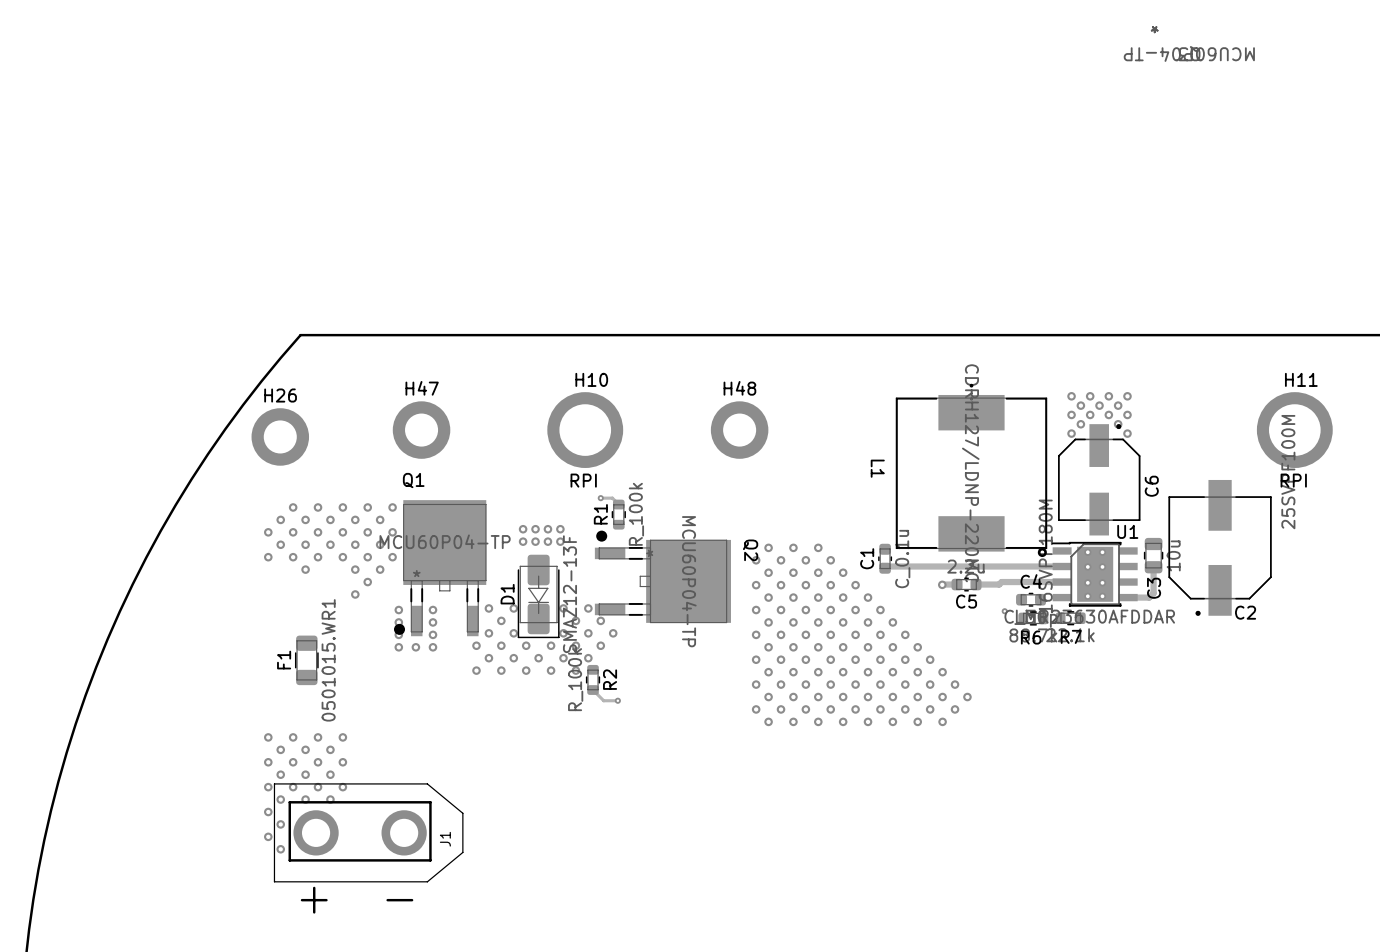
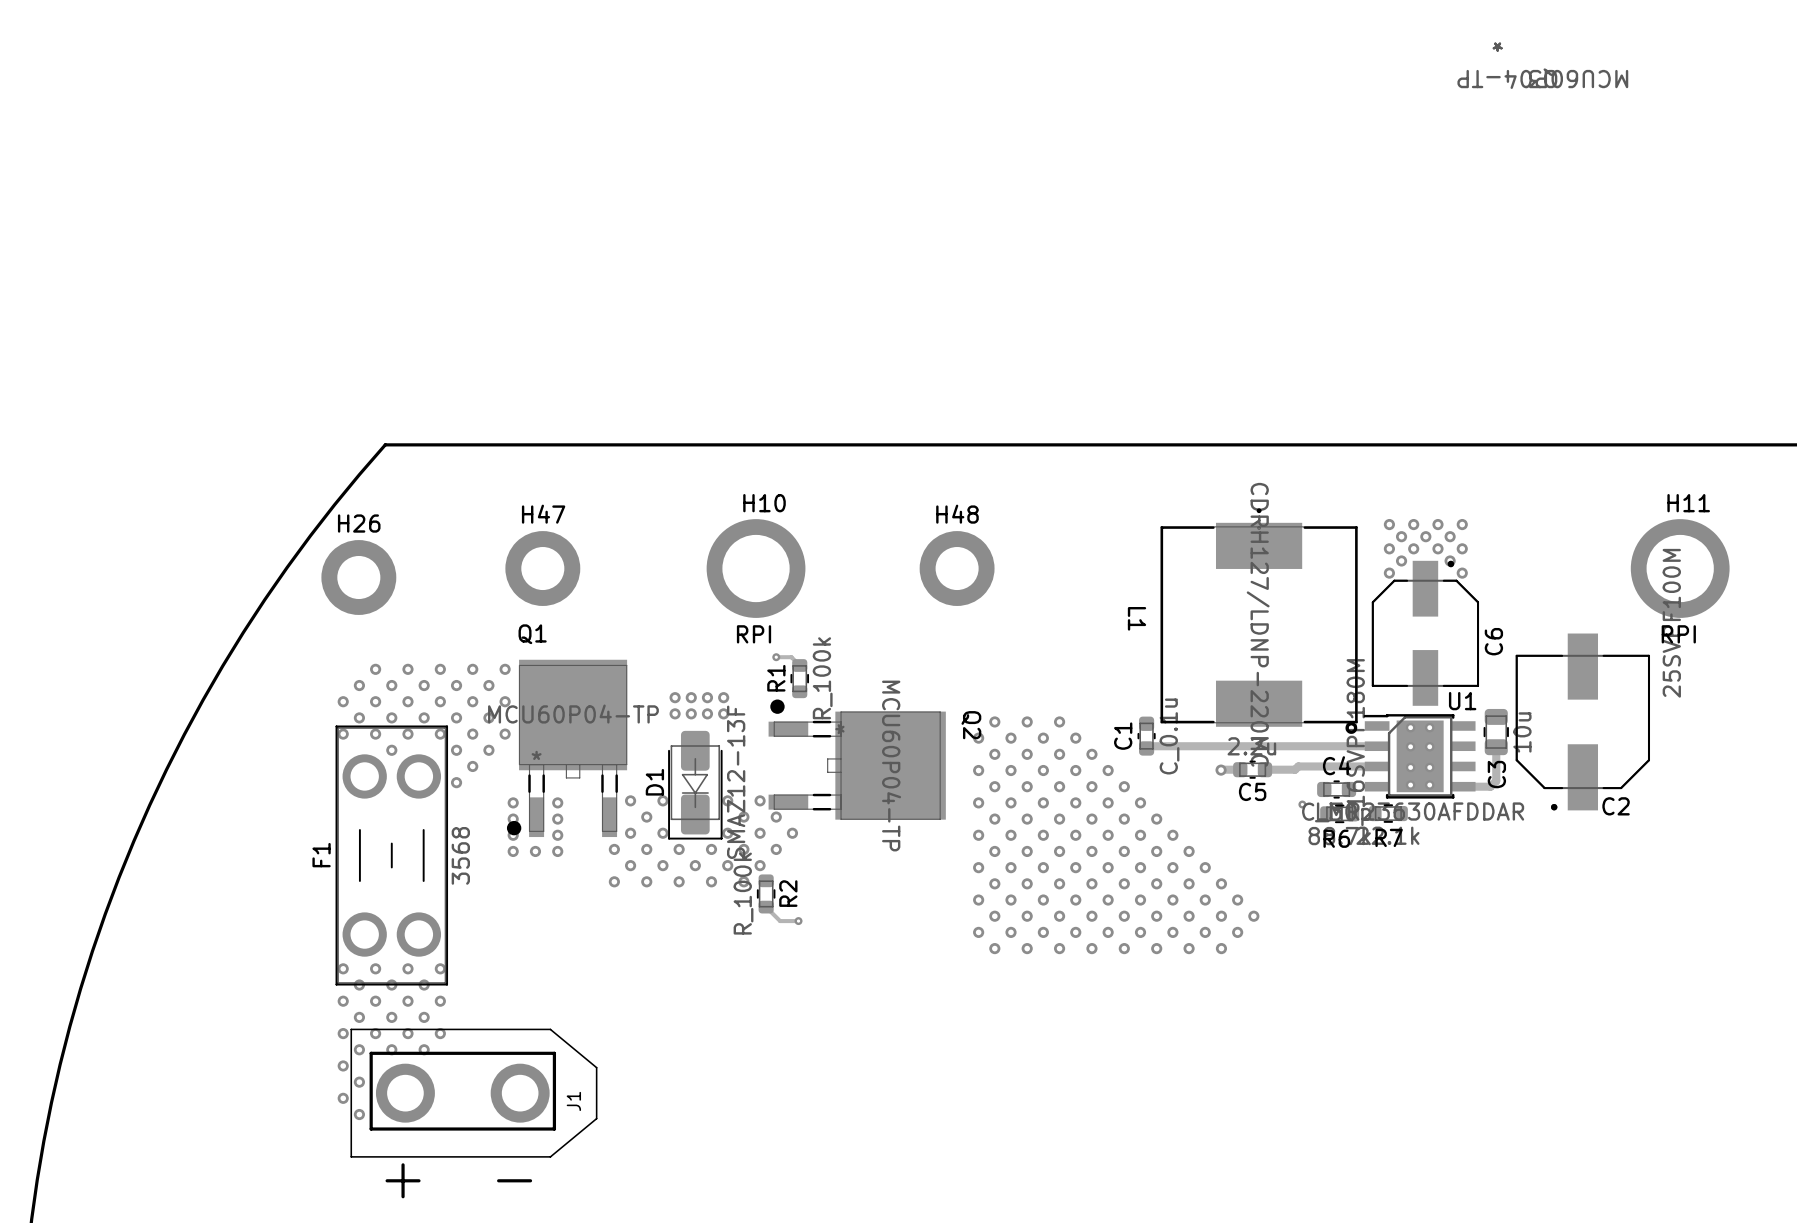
F1 footprint: [294, 635, 319, 686] -> [335, 725, 449, 986]
F1 name position: F1 (284, 660) -> F1 (321, 855)
F1 value: 0501015.WR1 (328, 660) -> 3568 (460, 855)

